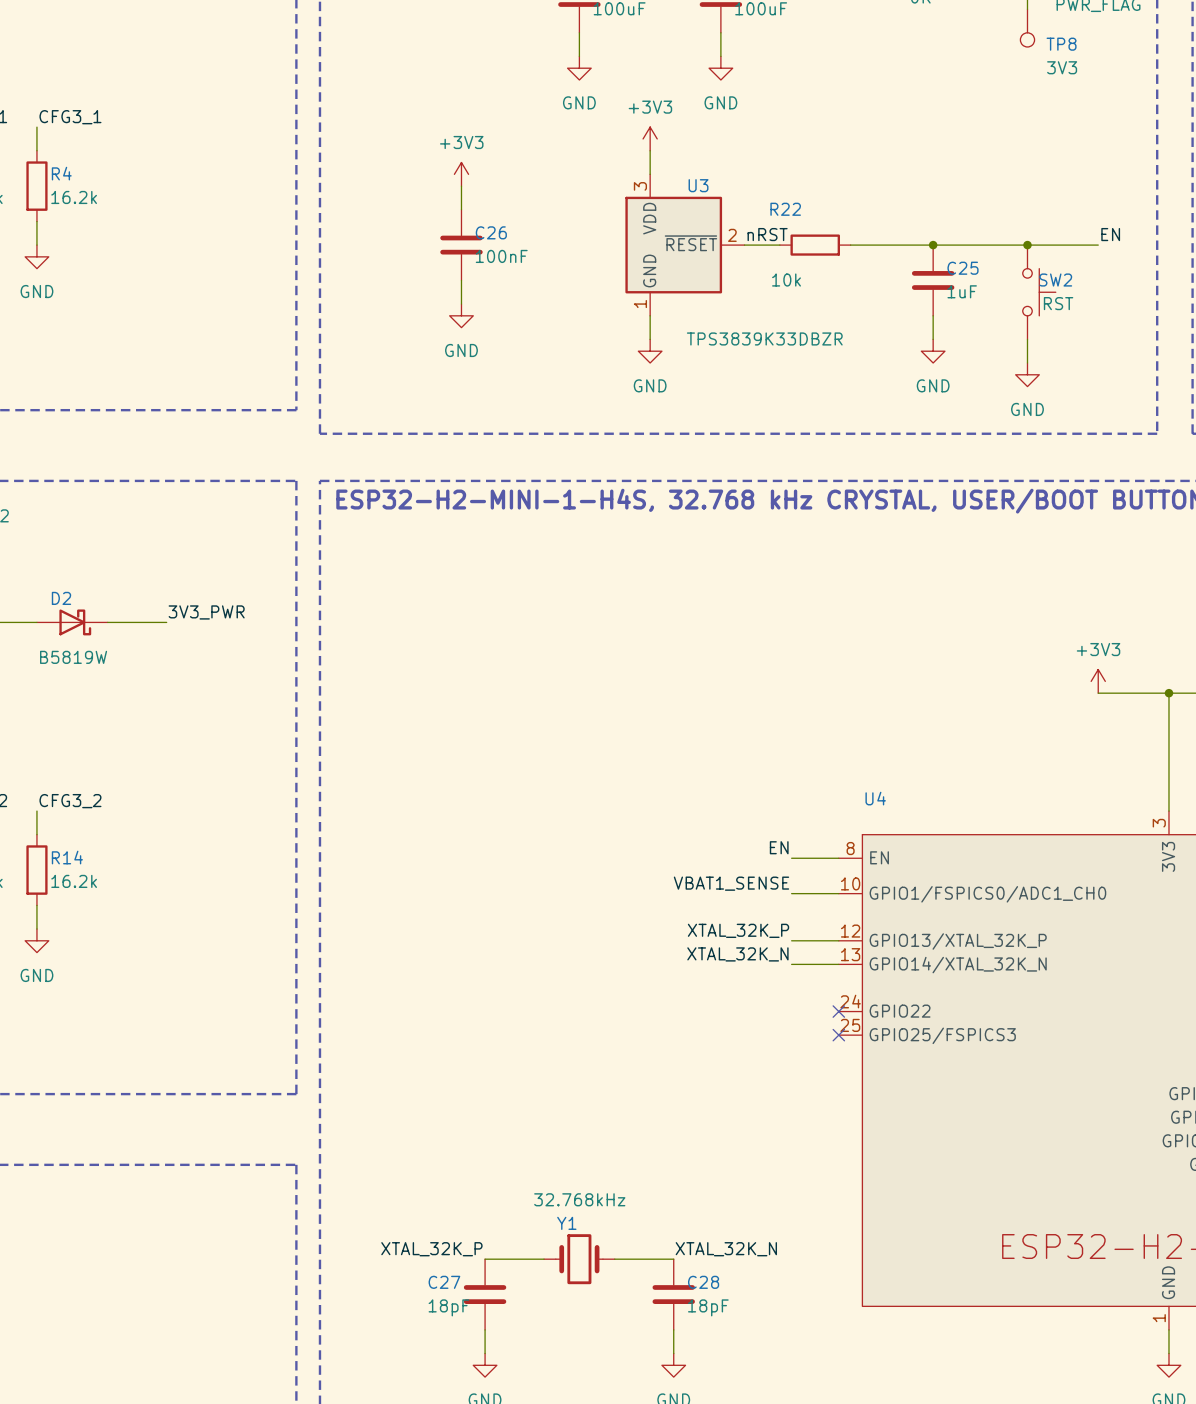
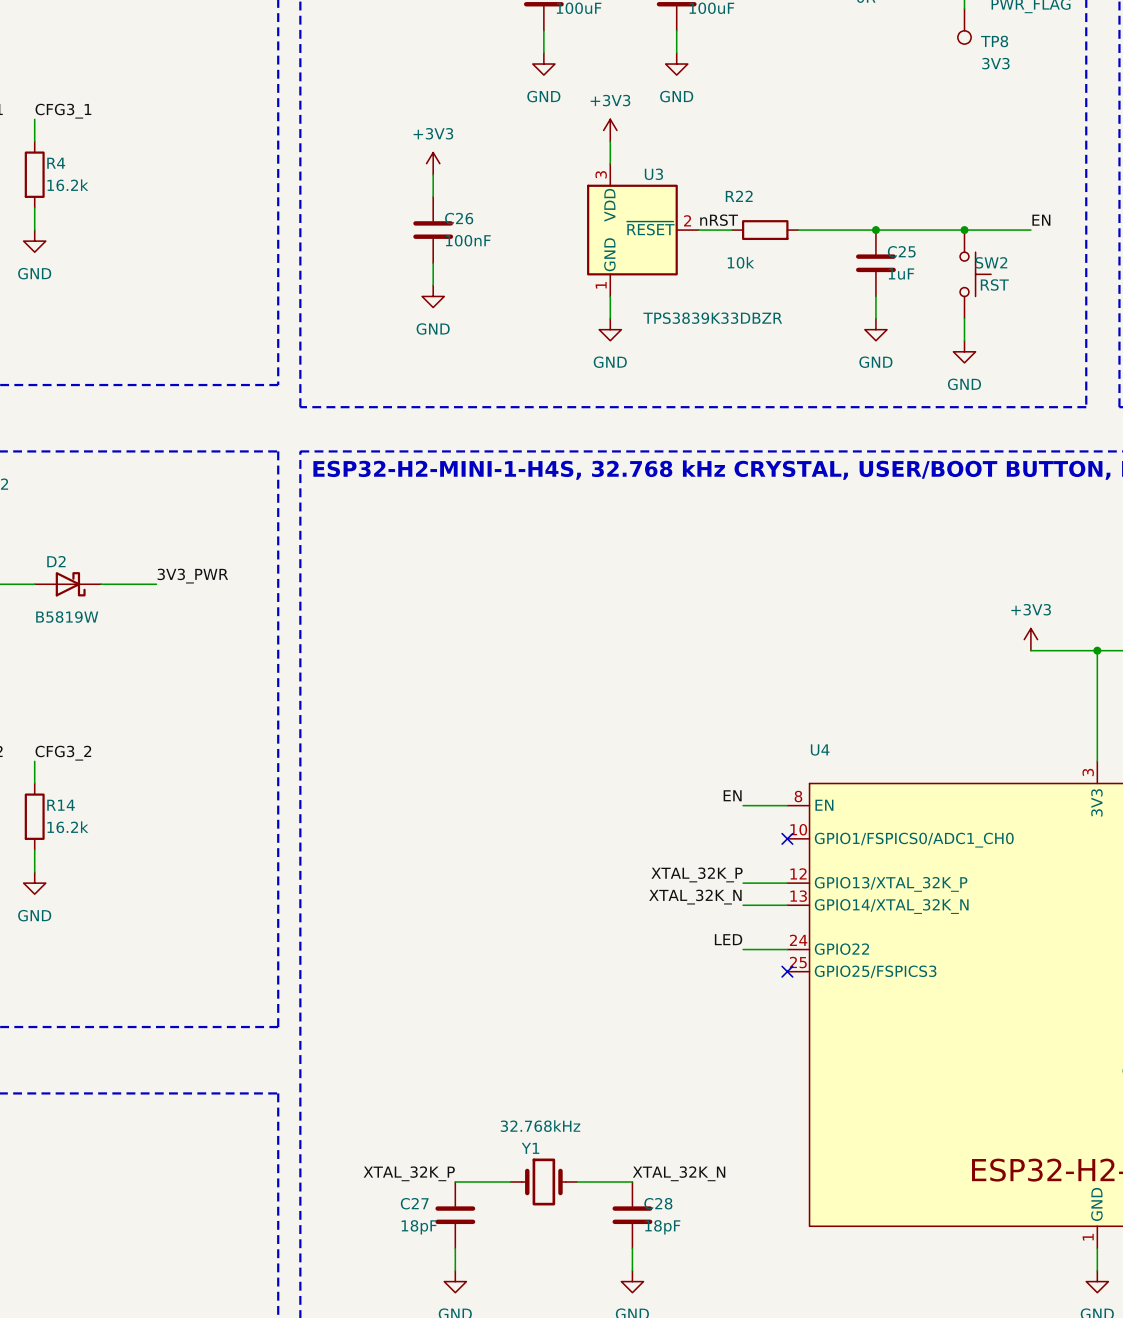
label: VBAT1_SENSE (731, 883) -> none
wire: (791, 893) (838, 893) -> (743, 949) (787, 949)
no-connect mark: none -> (787, 838)
label: none -> LED (728, 939)
no-connect mark: (838, 1011) -> none

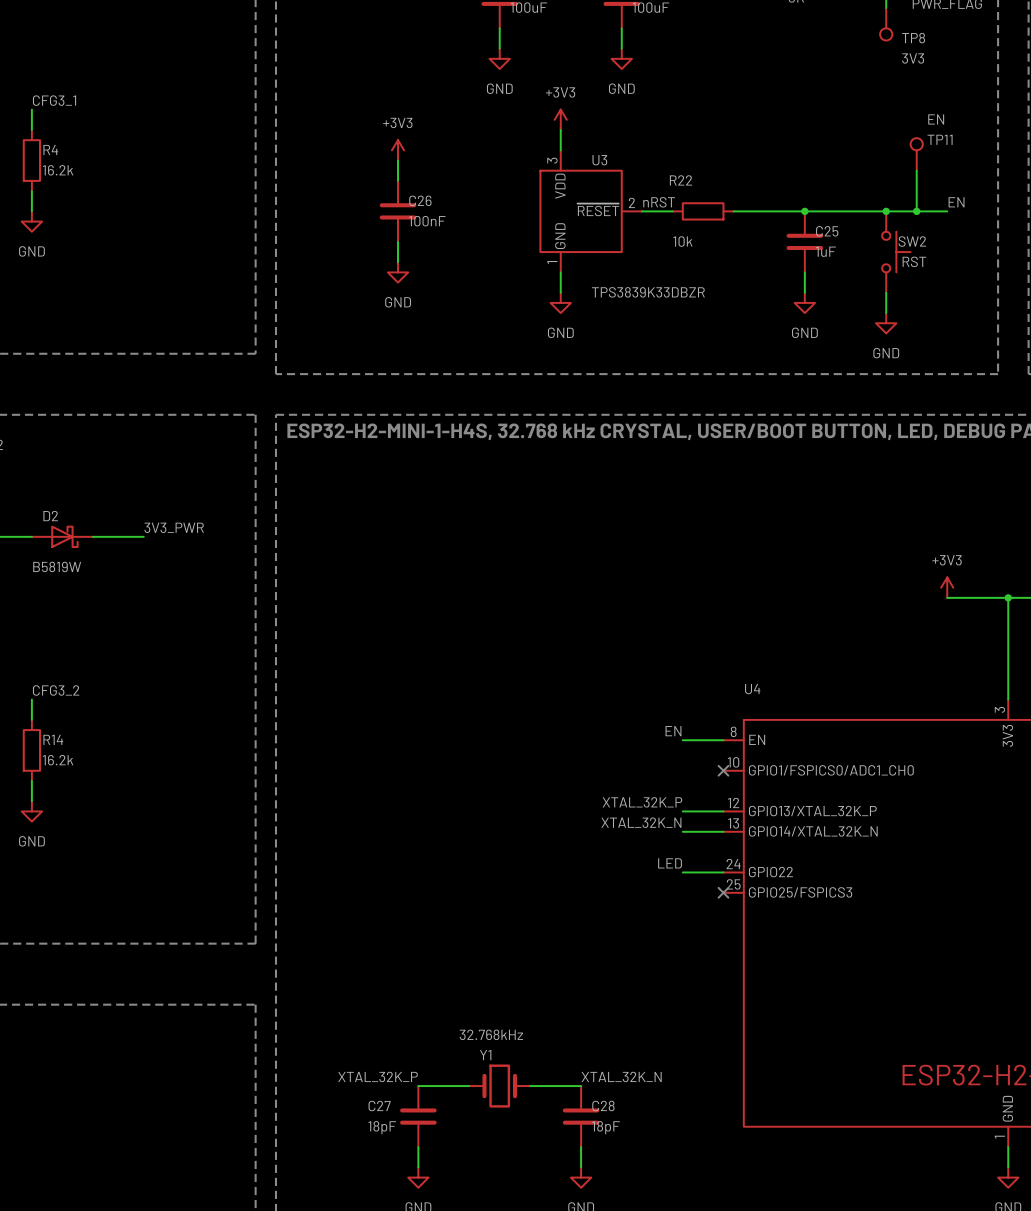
TP11: none -> EN (916, 154)
wire: none -> (916, 170) (916, 211)
junction: none -> (916, 211)

